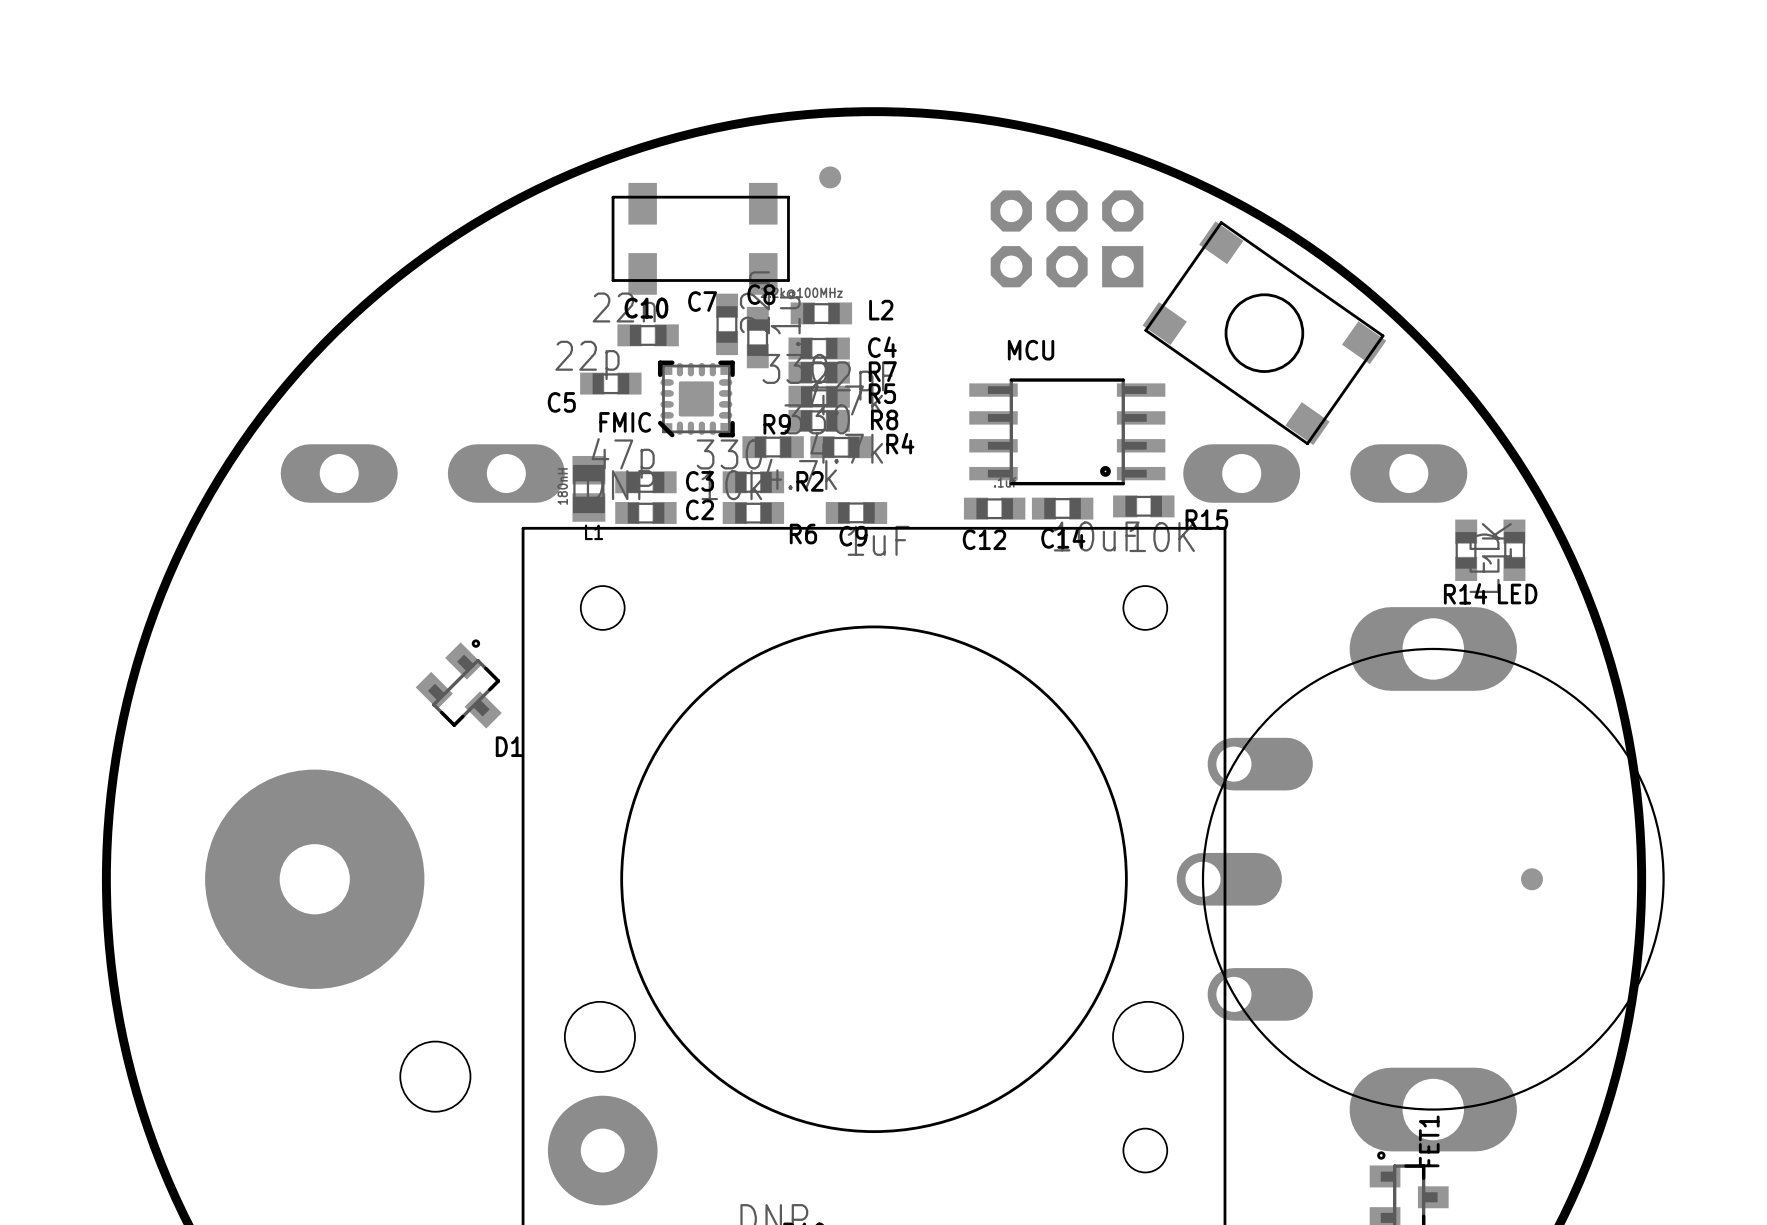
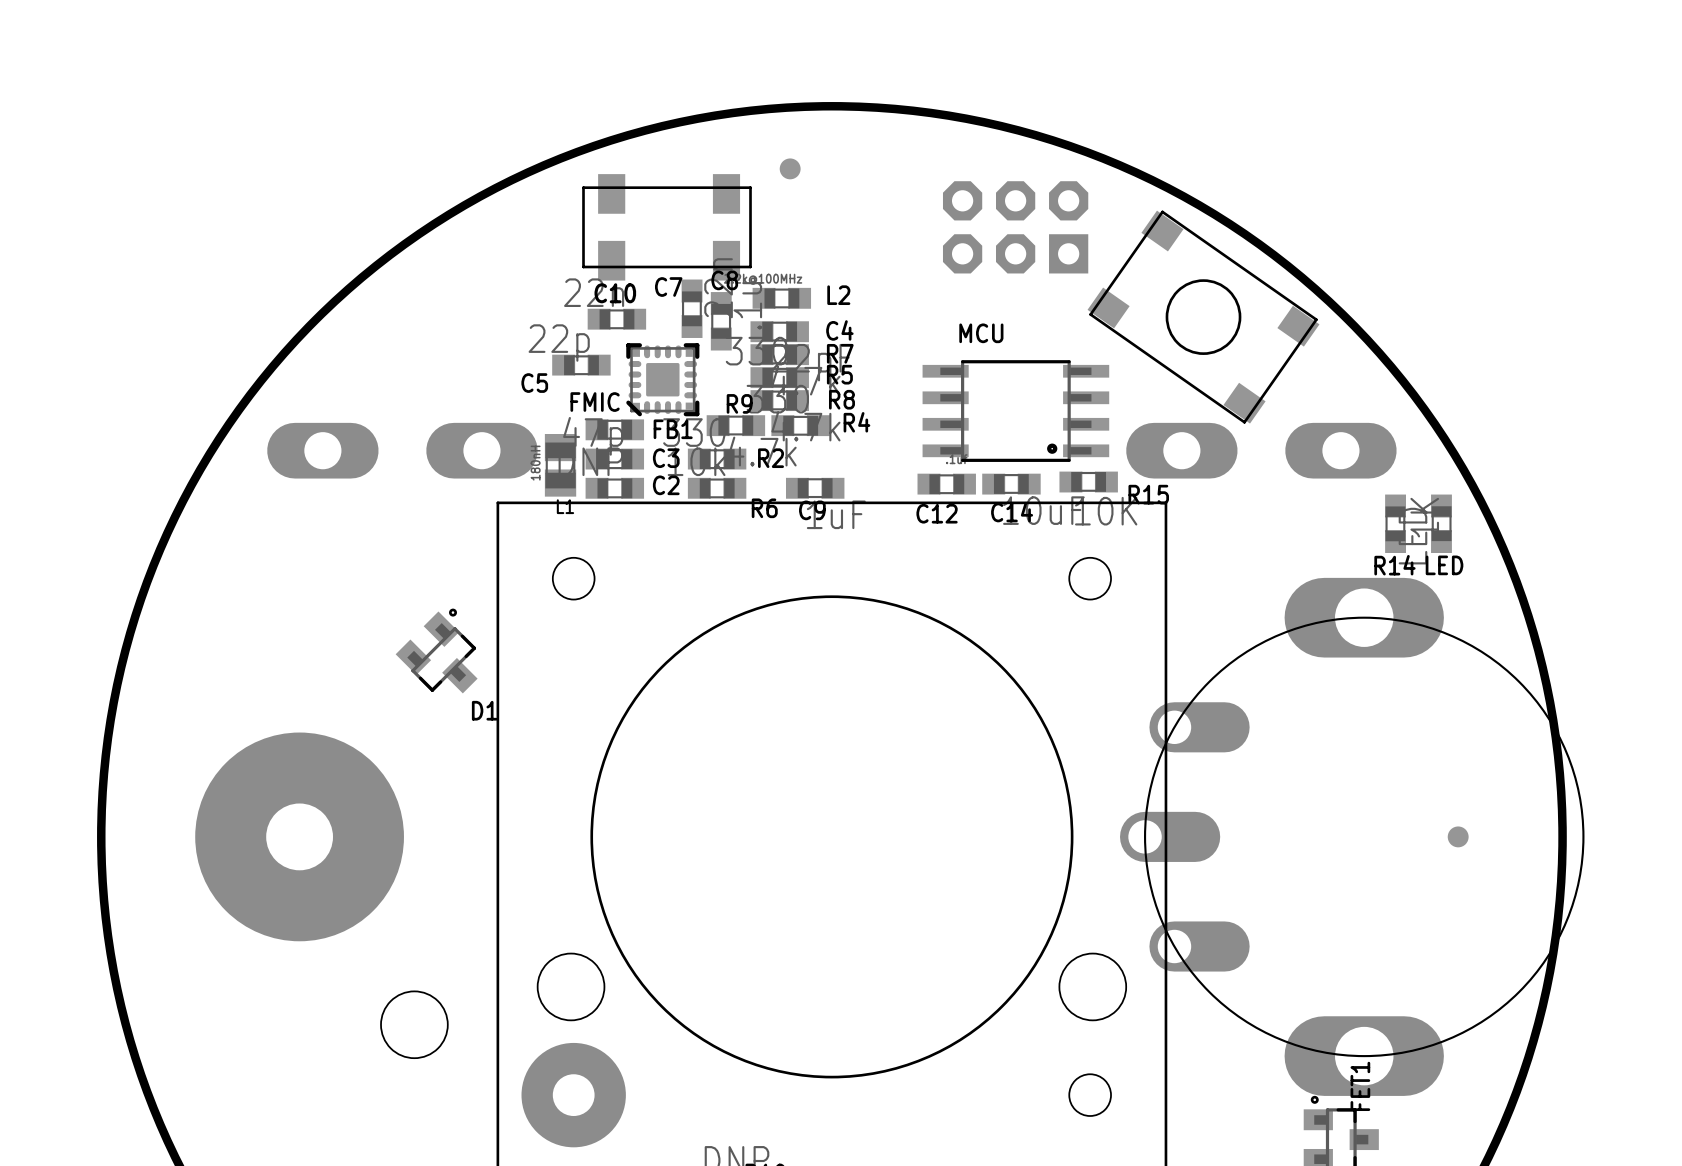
FB1: none -> (614, 429)

